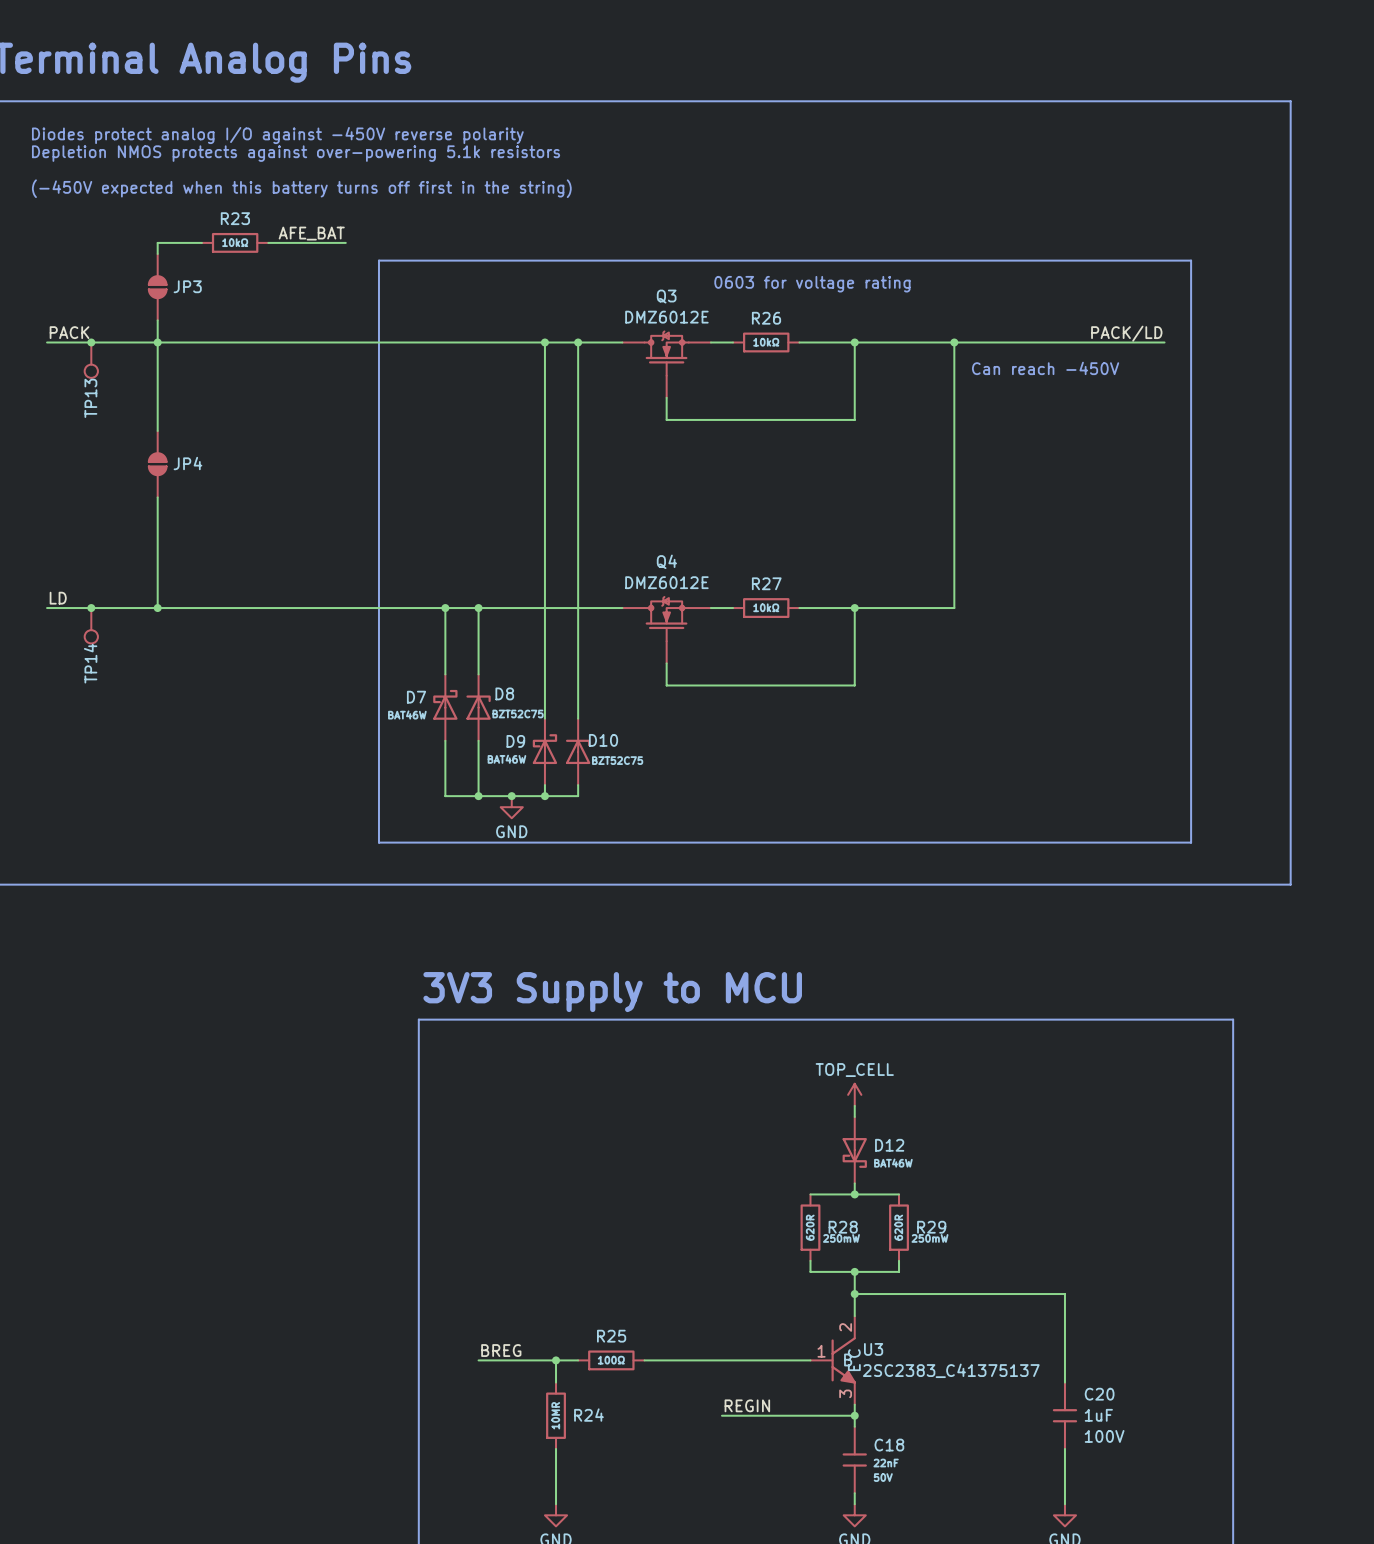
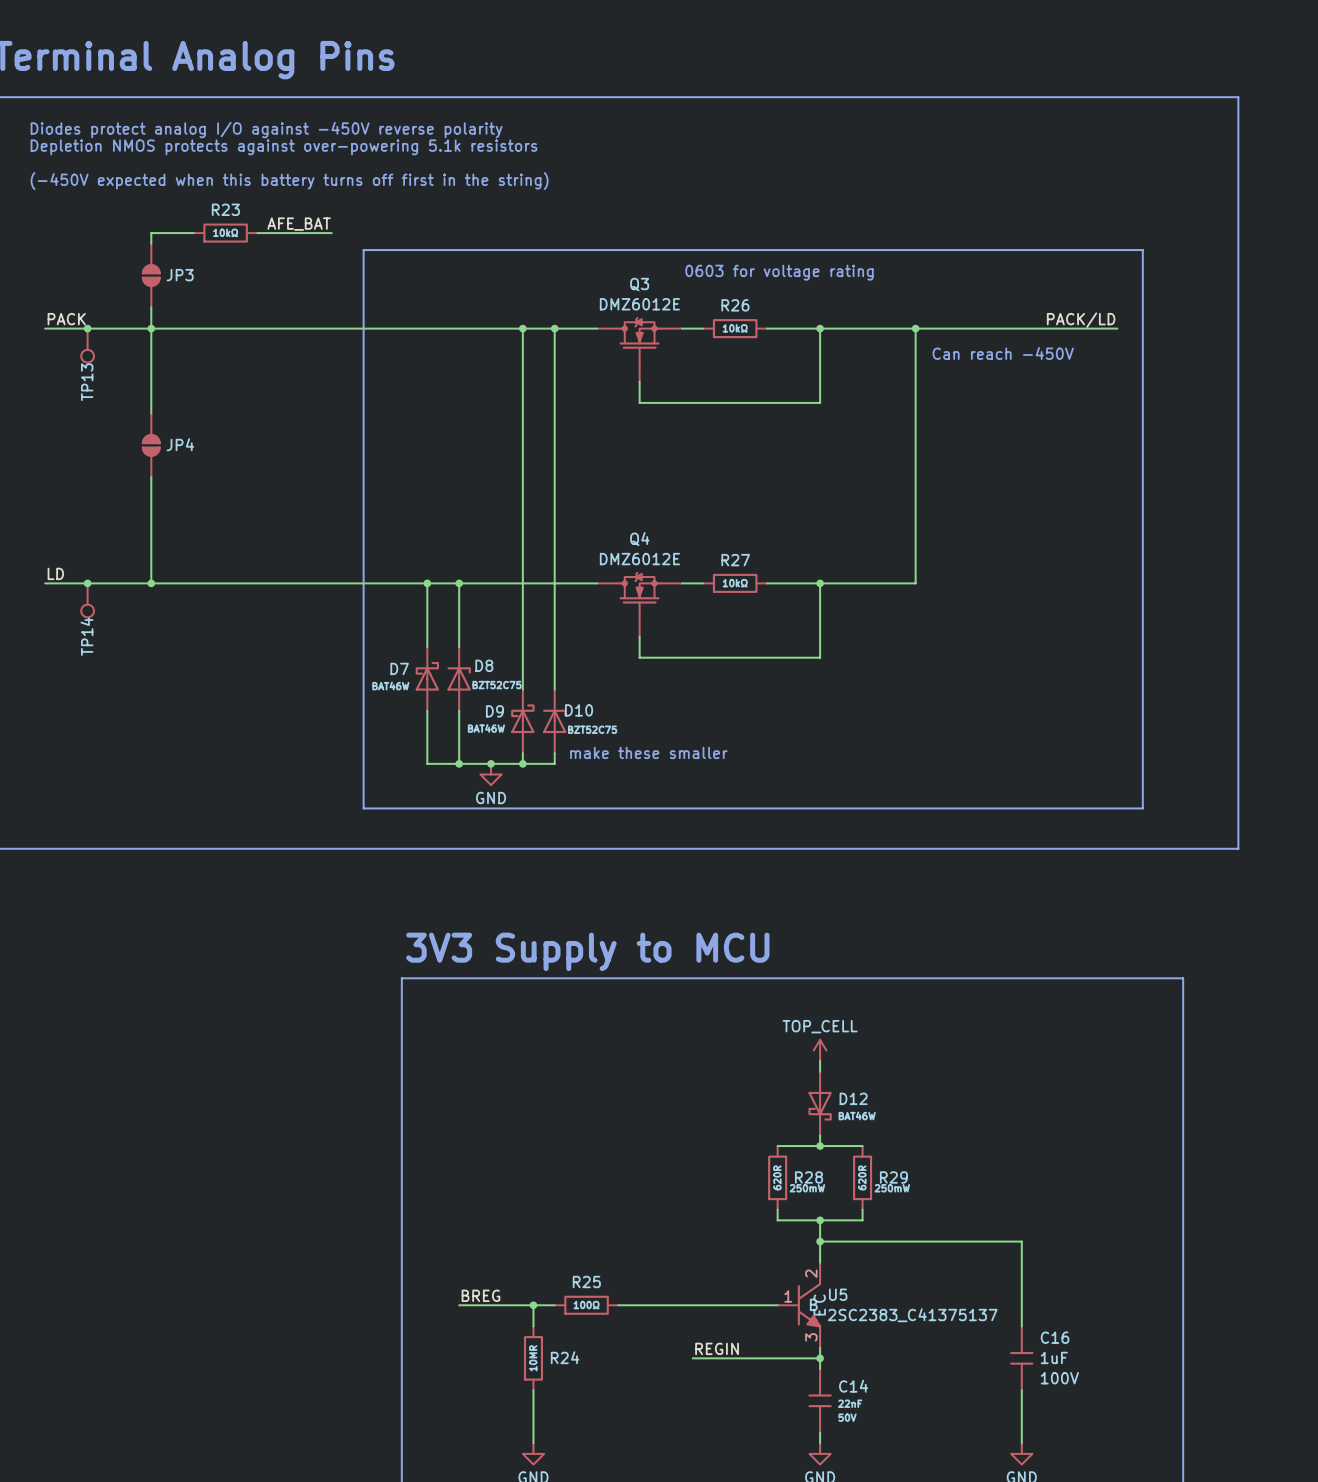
text: none -> make these smaller (648, 752)
U3 name: U3 (873, 1349) -> U5 (838, 1294)
C20 name: C20 (1099, 1394) -> C16 (1055, 1337)
C18 name: C18 (889, 1445) -> C14 (853, 1386)

